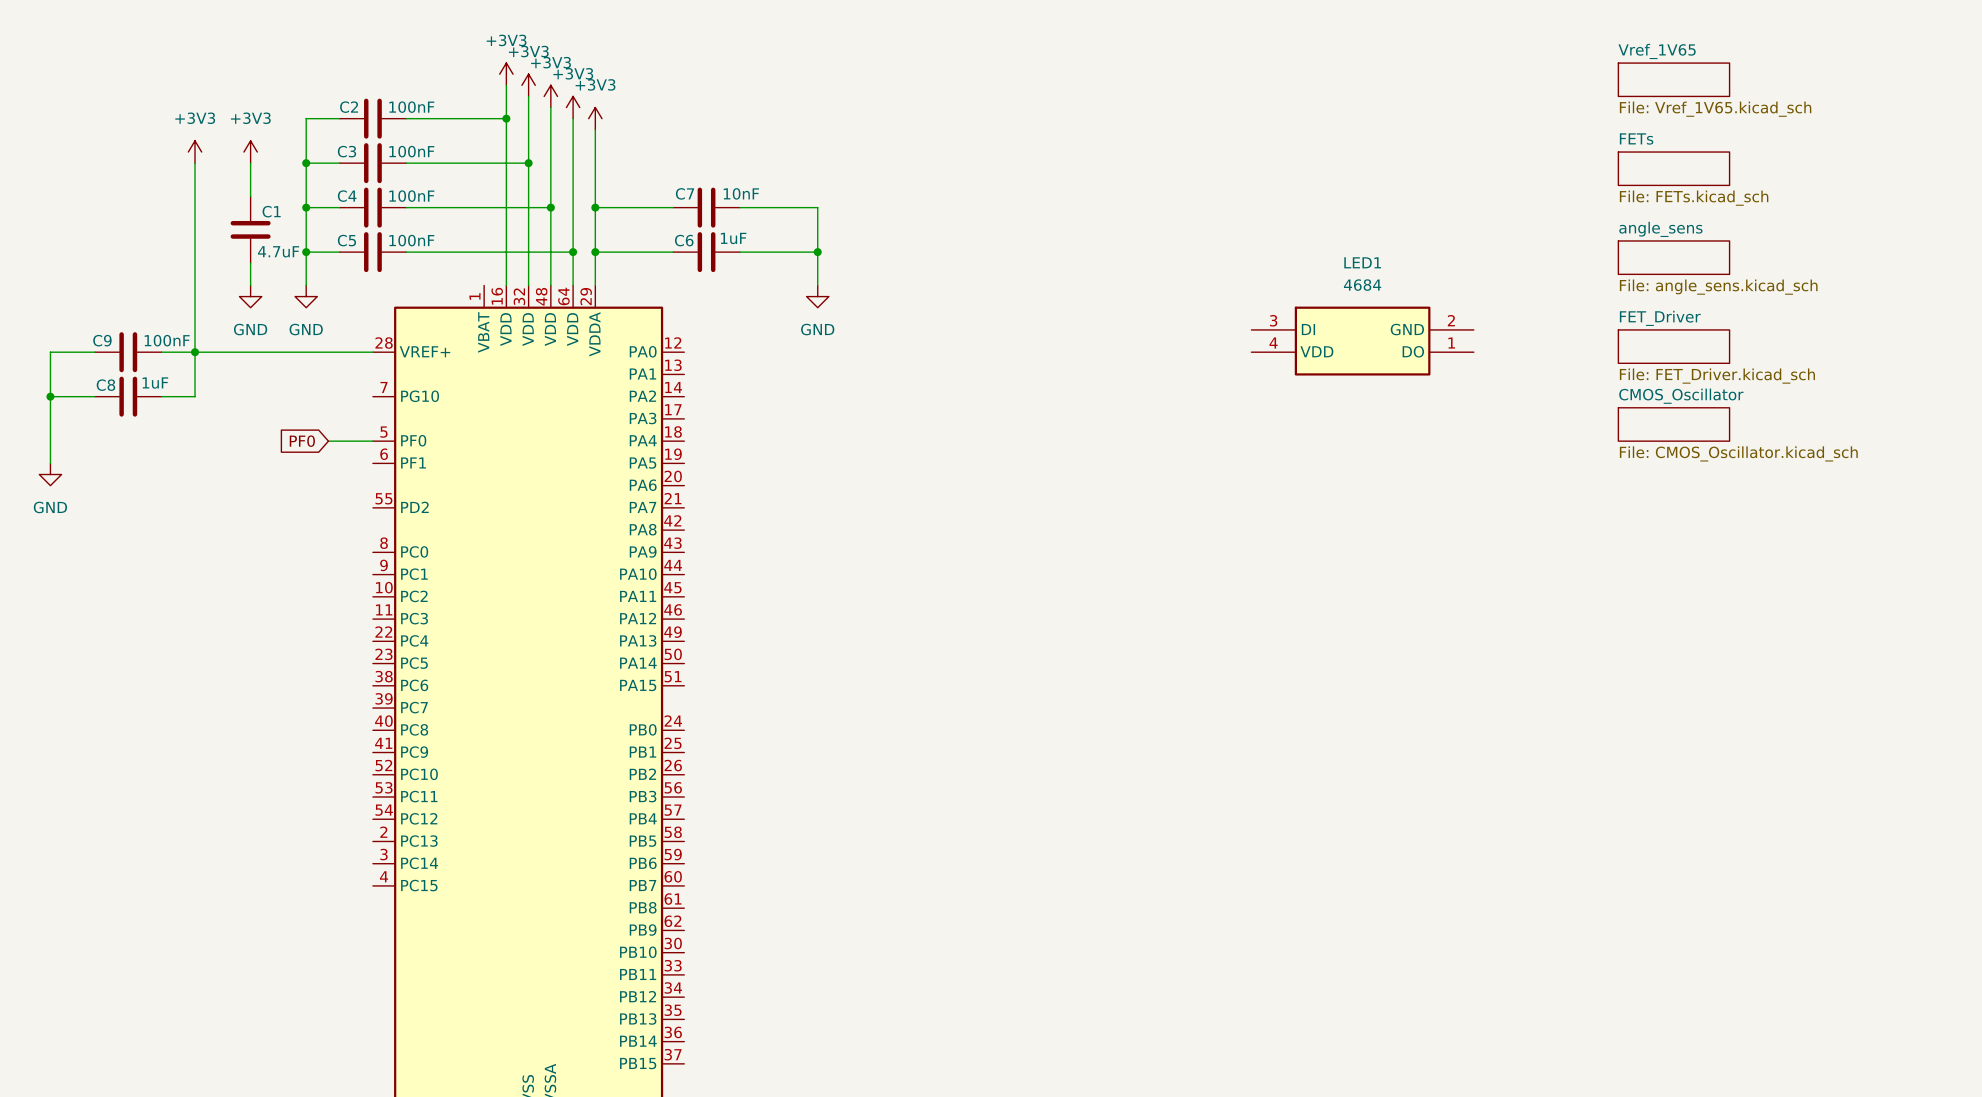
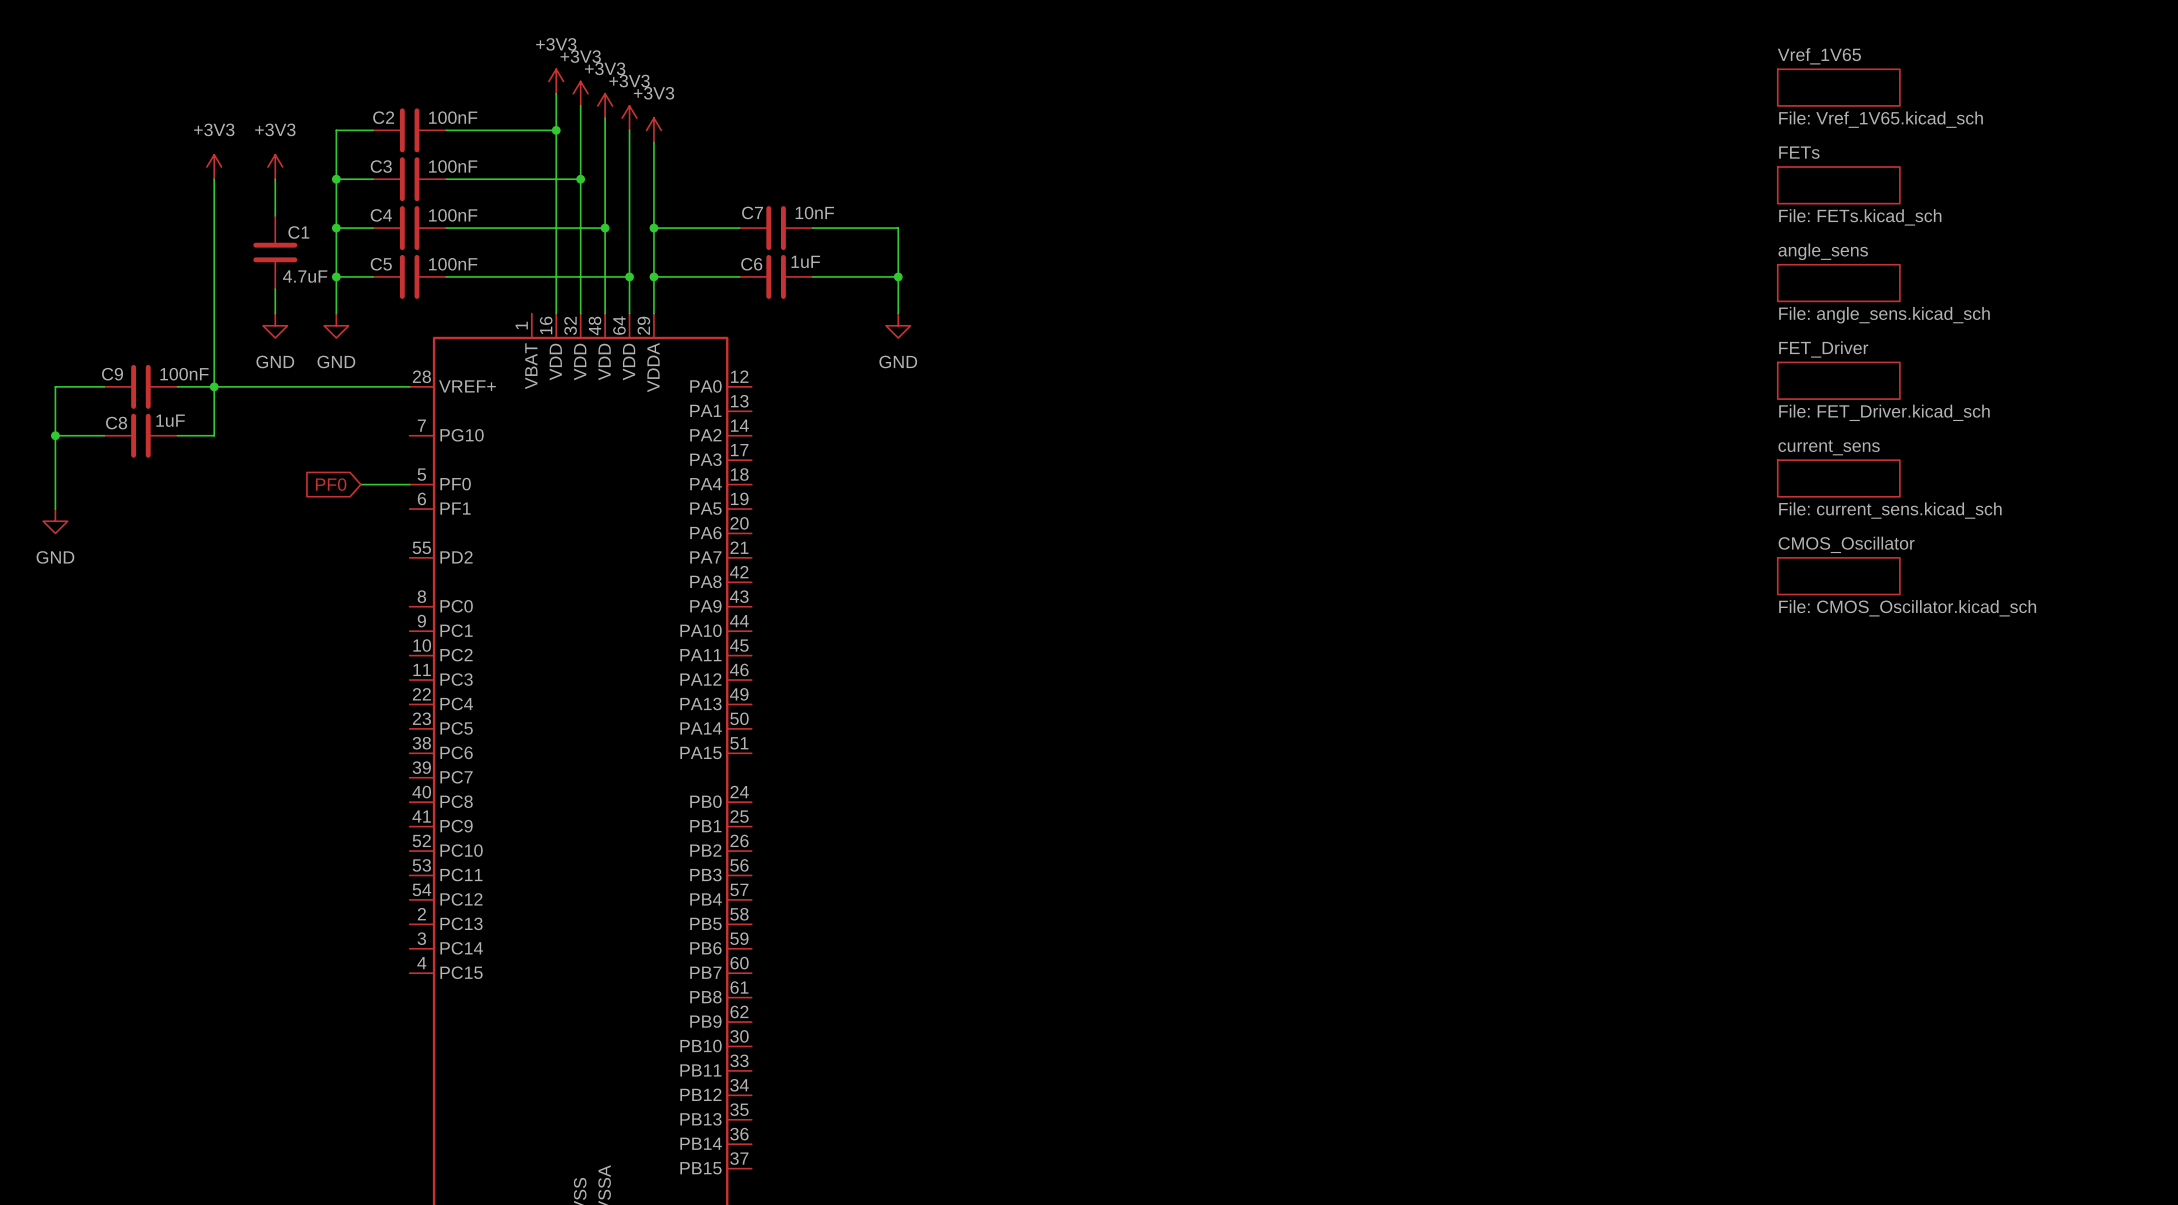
LED1: 4684 (1362, 341) -> none
sheet CMOS_Oscillator position: (1673, 424) -> (1838, 576)
sheet current_sens: none -> File: current_sens.kicad_sch (1838, 478)

